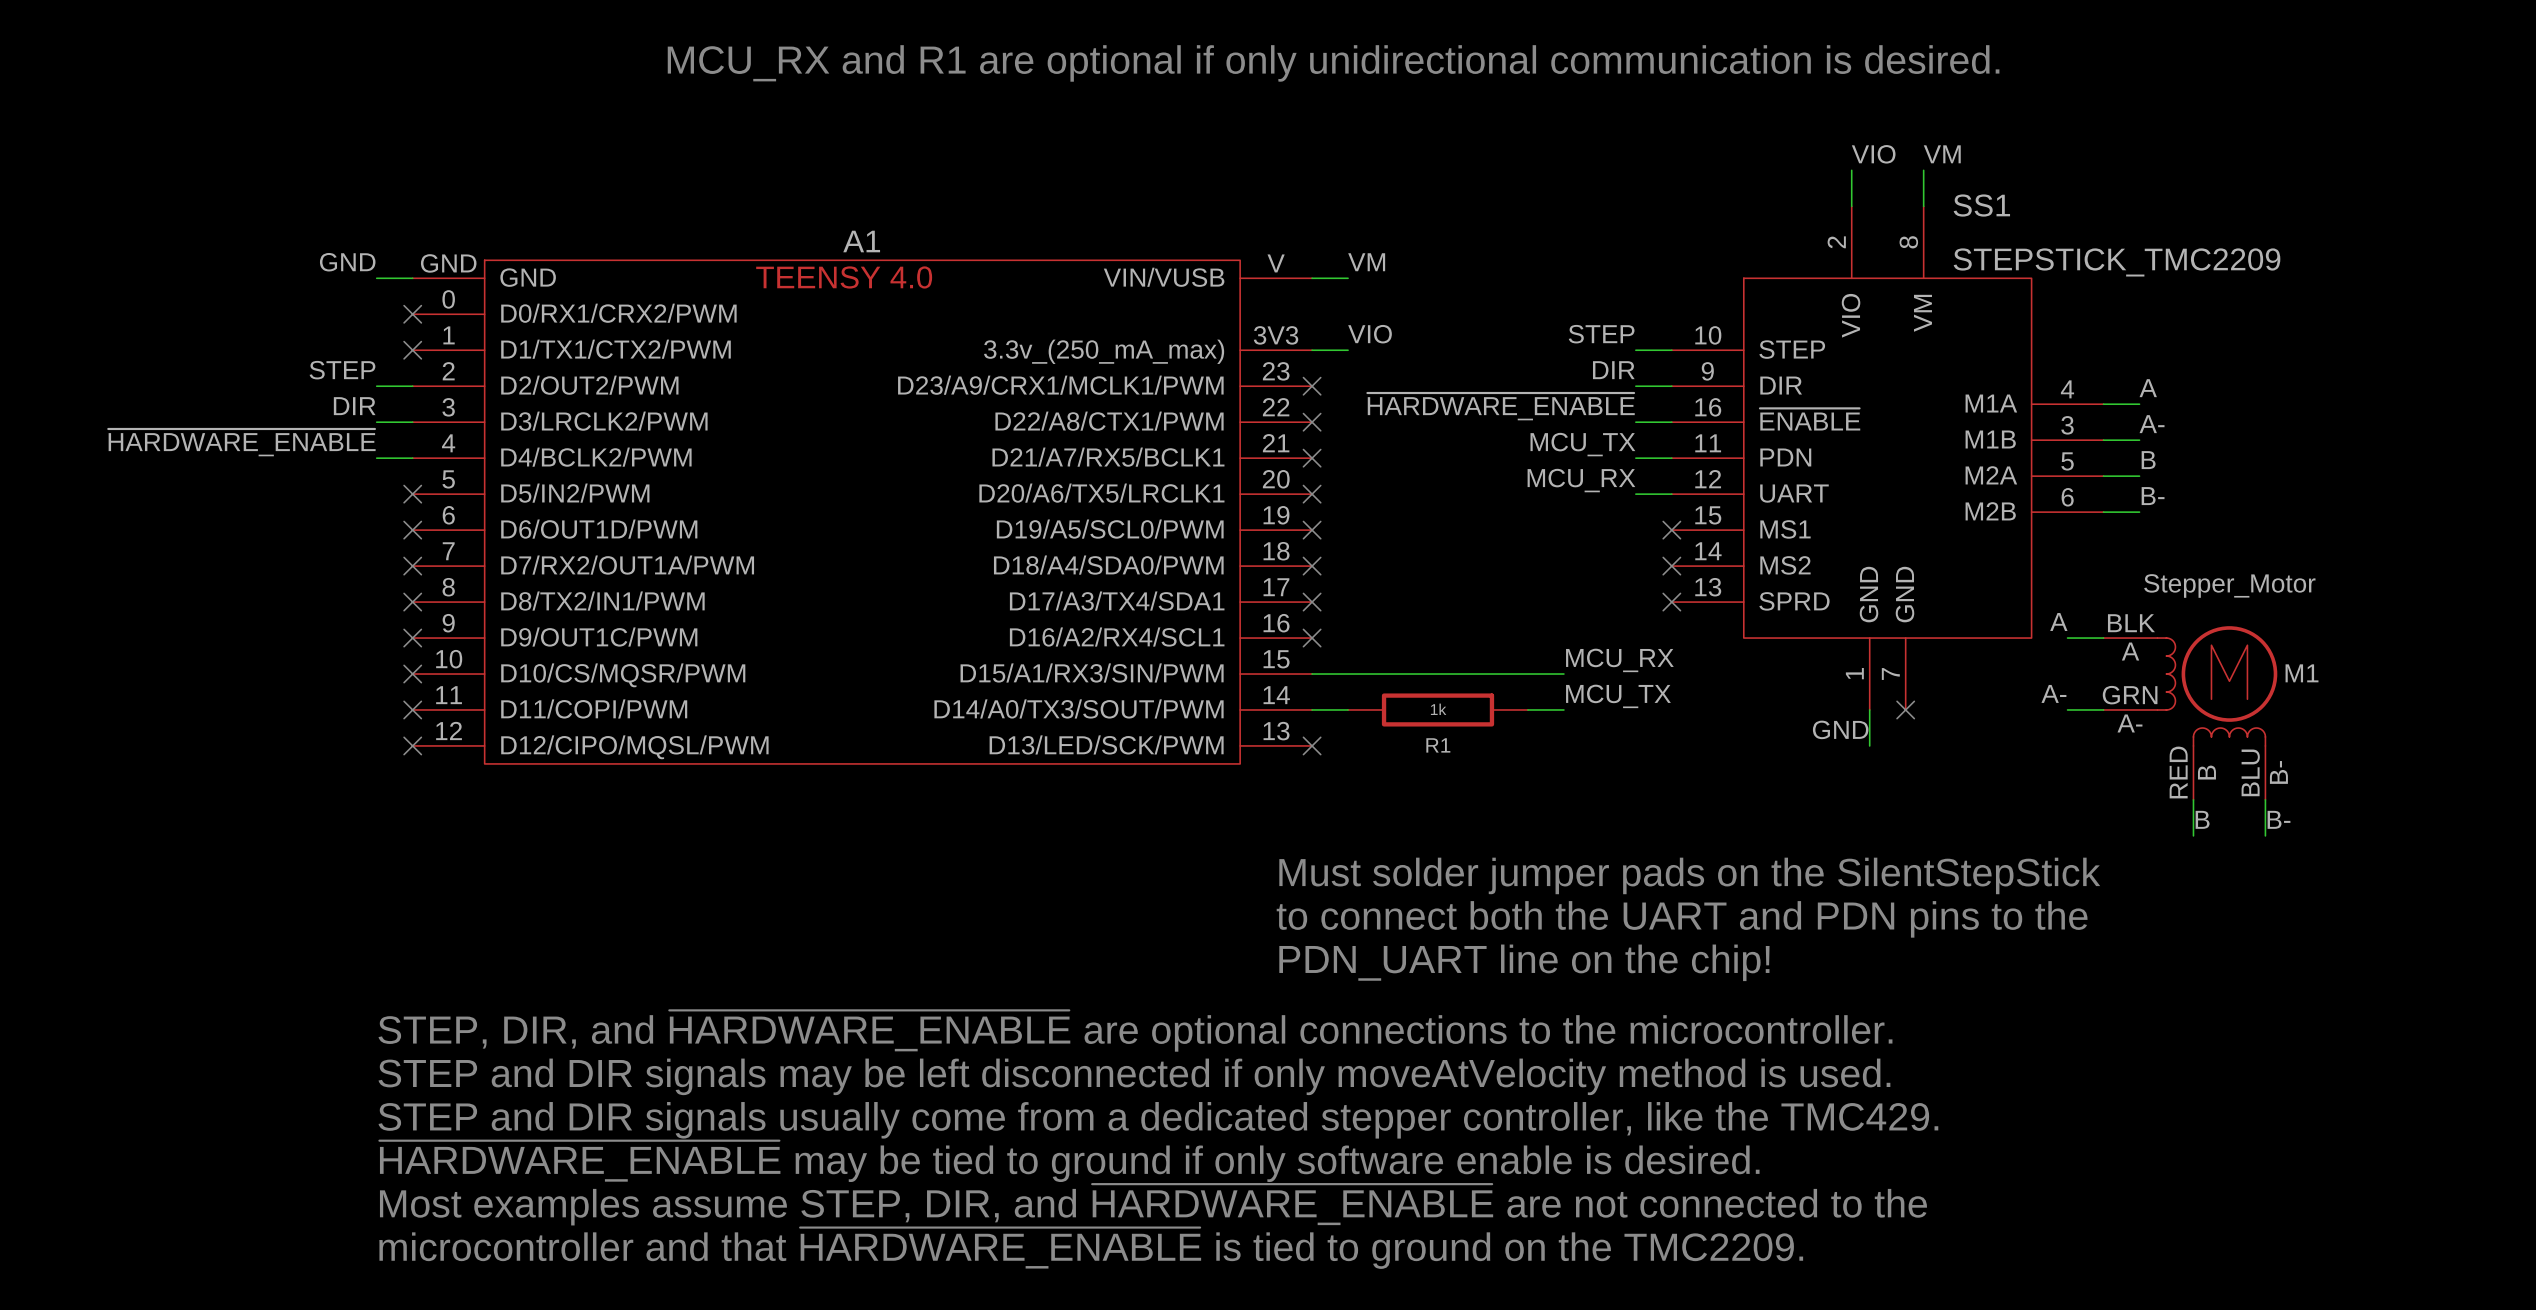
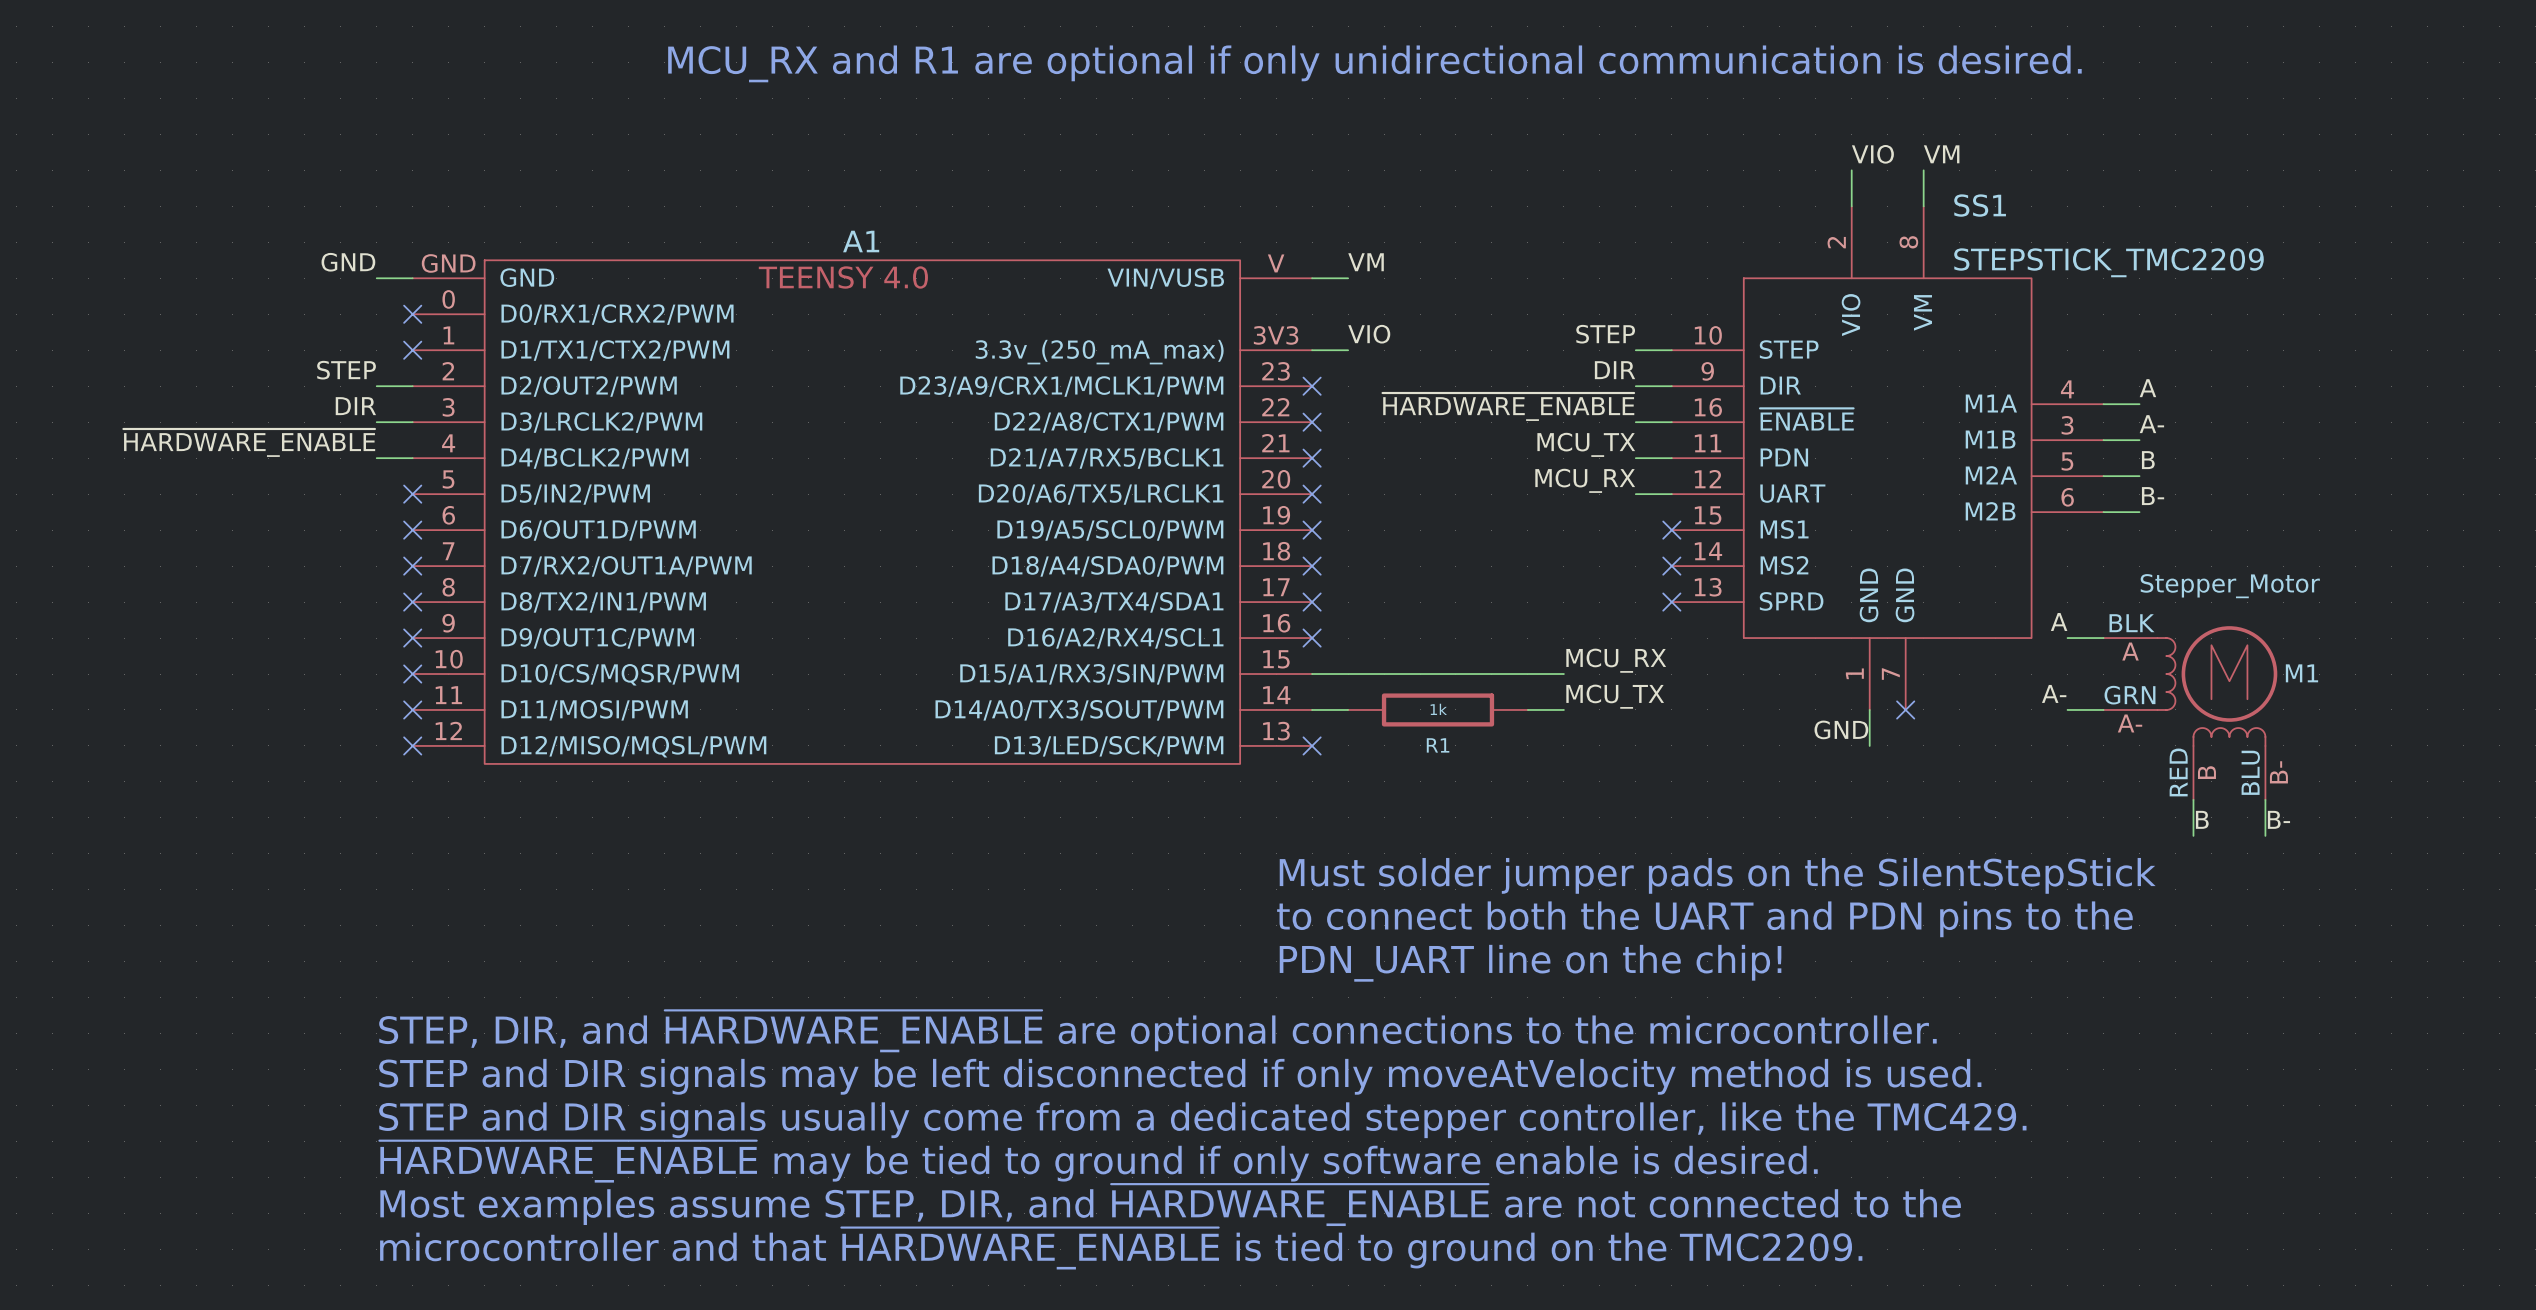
A1 pin name: D11/COPI/PWM (594, 708) -> D11/MOSI/PWM (594, 710)
A1 pin name: D12/CIPO/MQSL/PWM (634, 747) -> D12/MISO/MQSL/PWM (633, 746)

